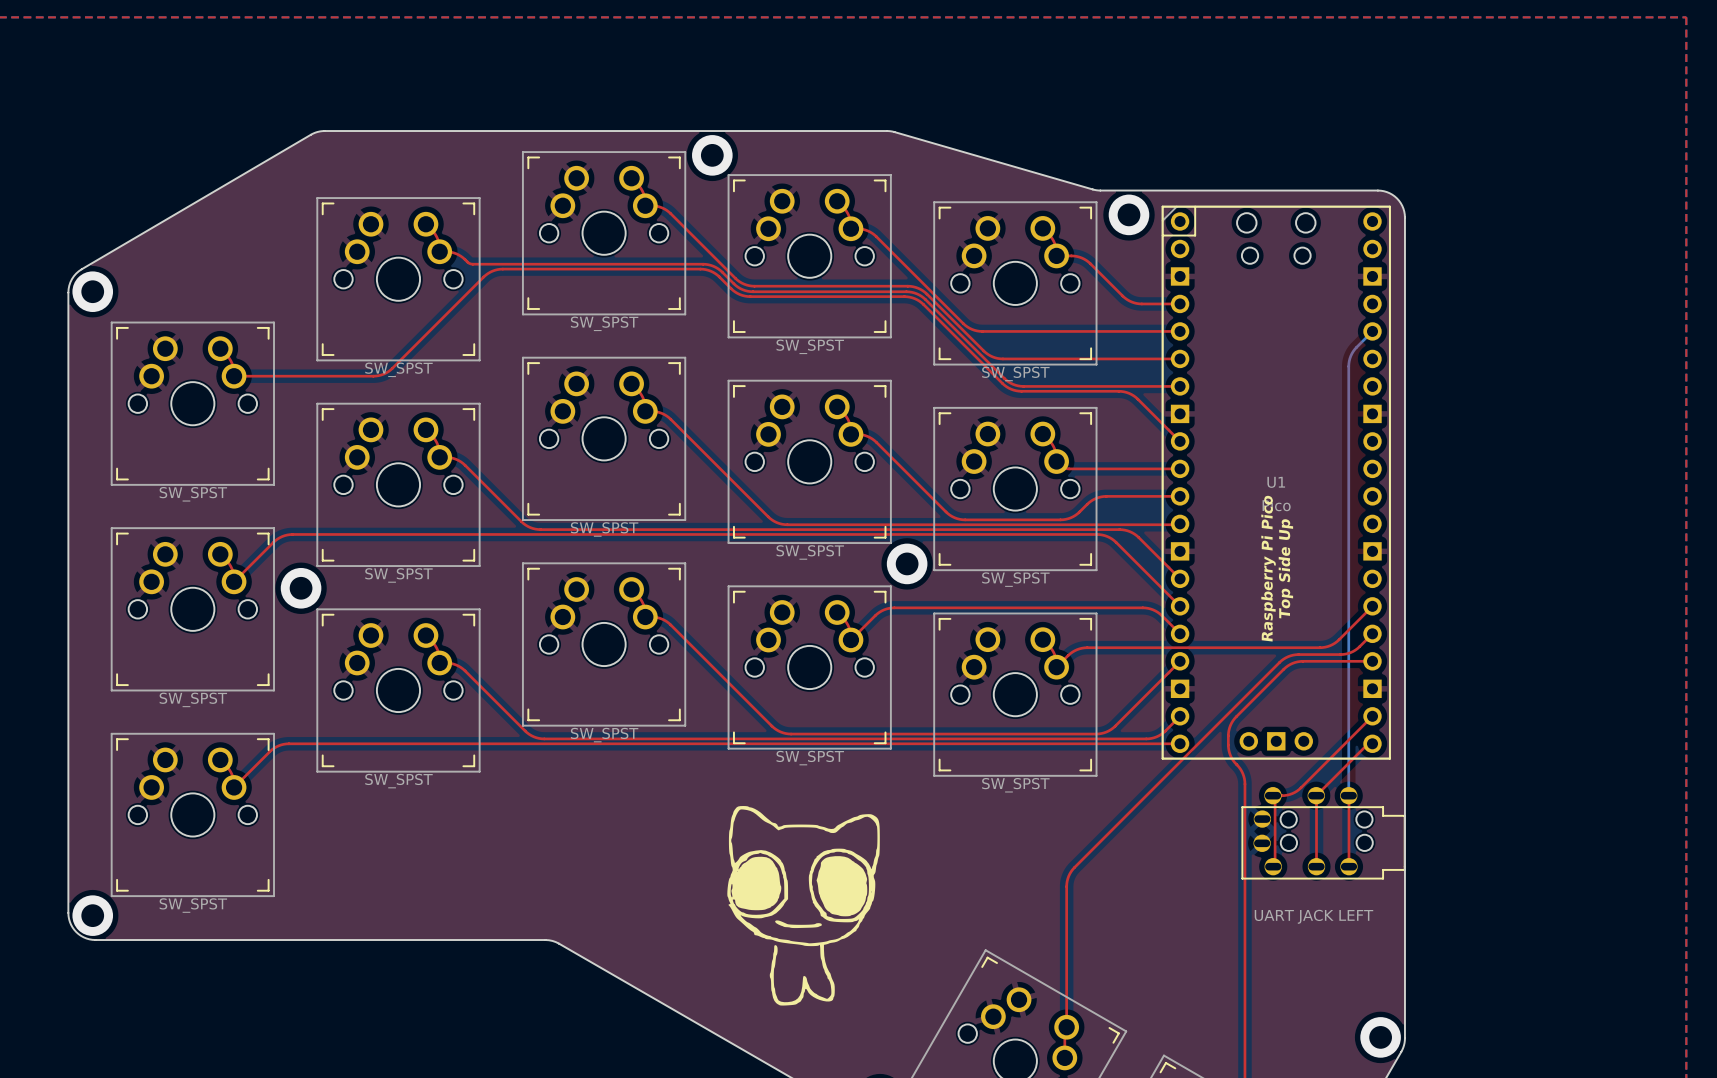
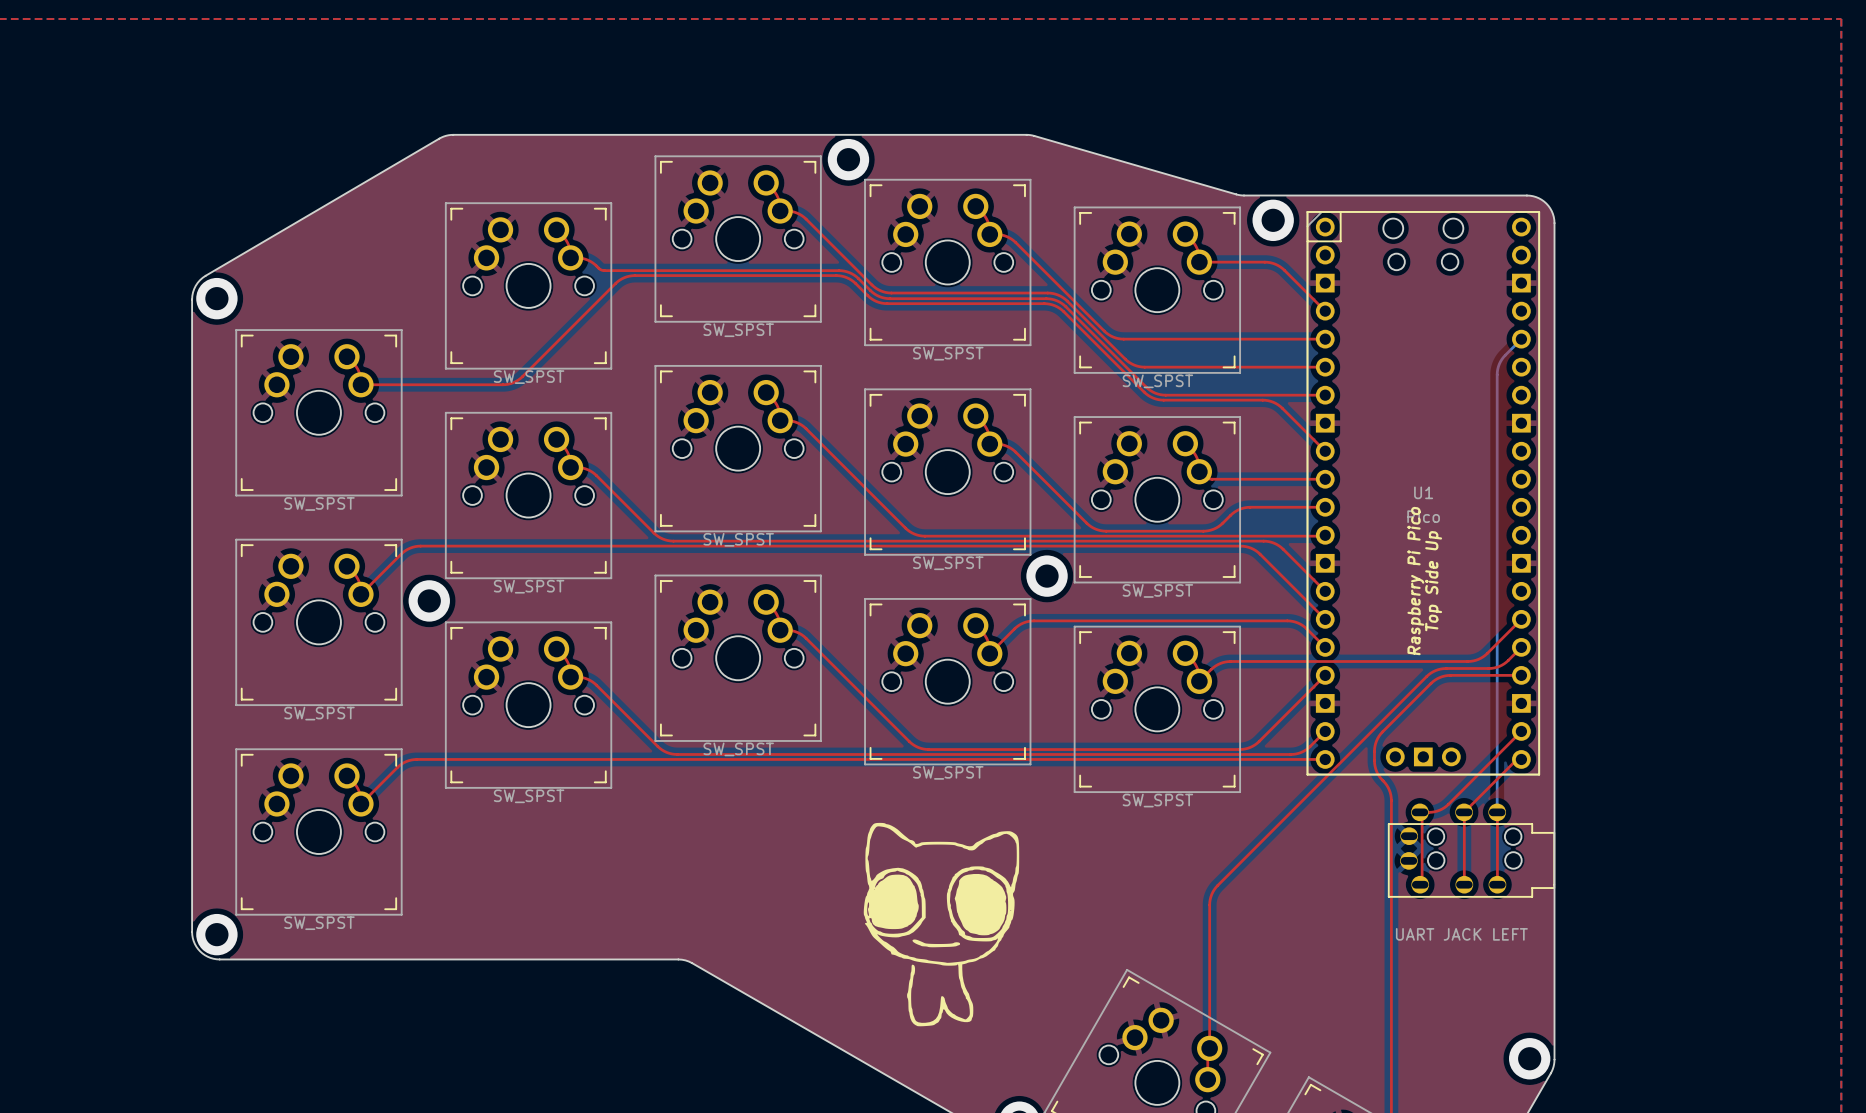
top track: (1071, 255) (1081, 257) (1088, 262) (1122, 296) (1131, 301) (1141, 303) (1180, 303) -> (1214, 262) (1264, 262) (1275, 264) (1284, 270) (1325, 311)

